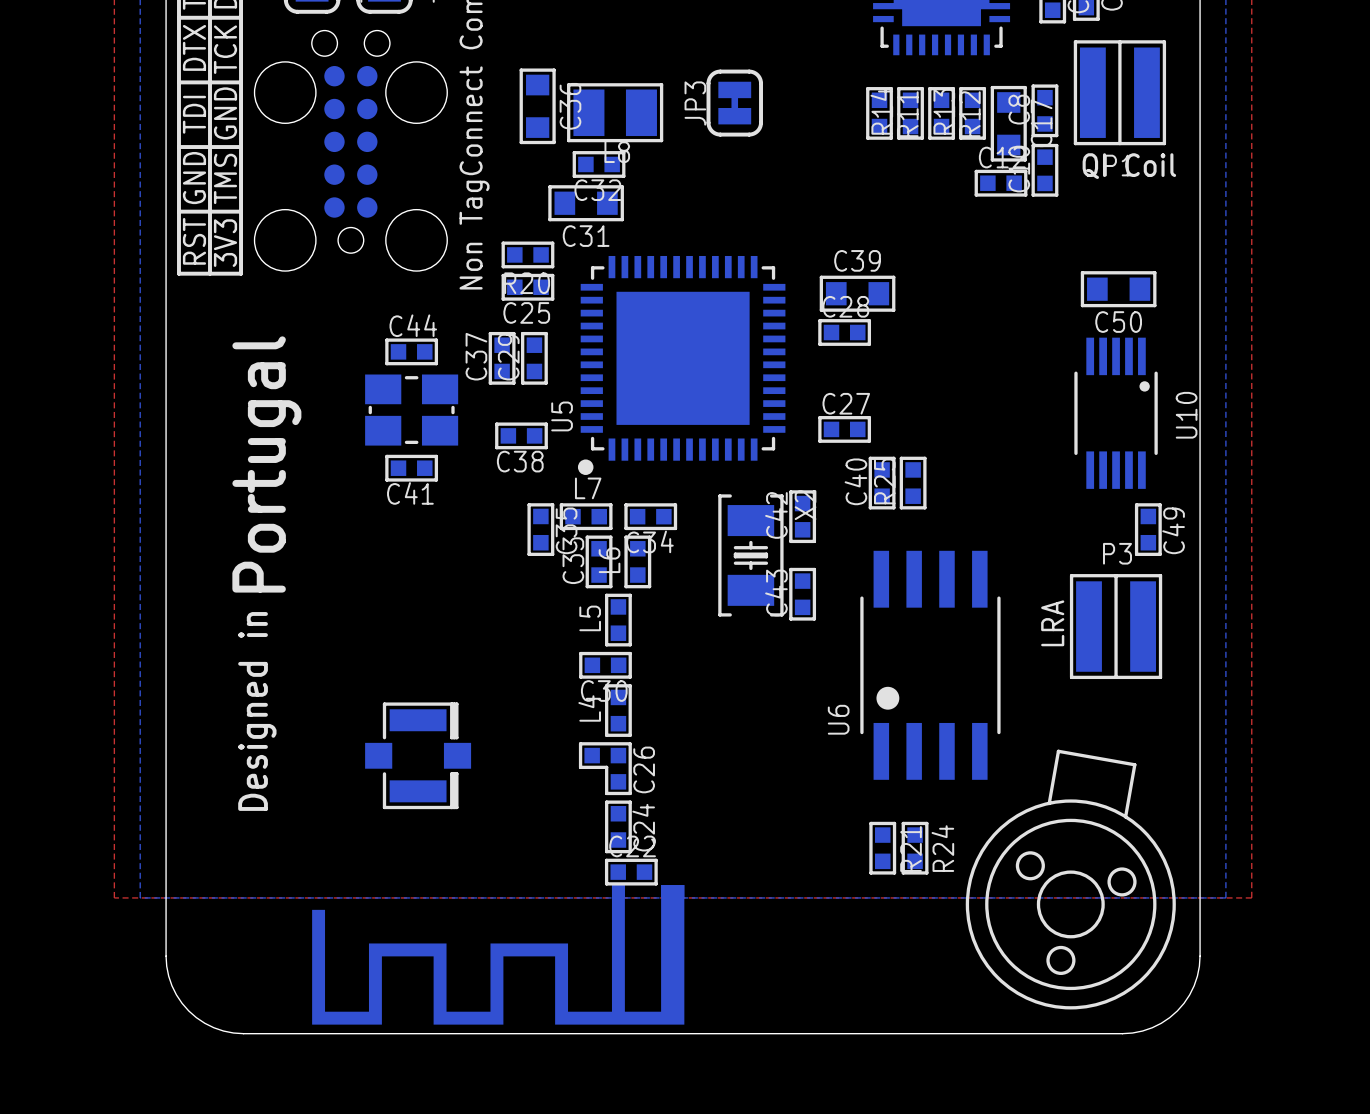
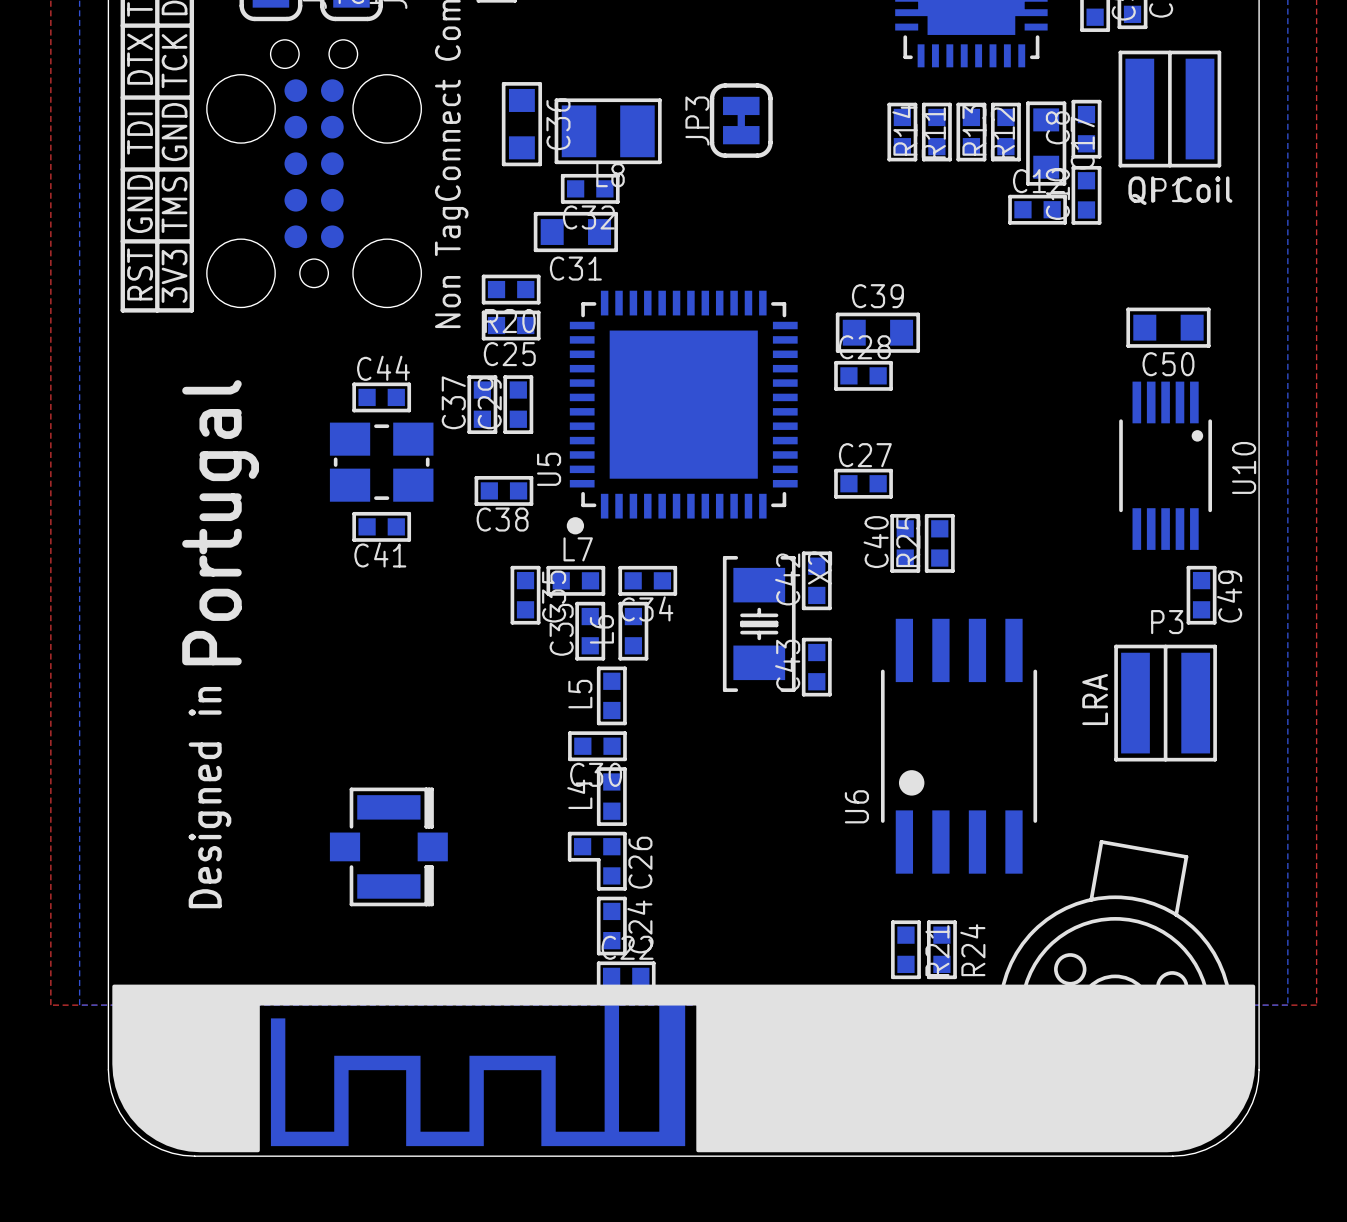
drawing: none -> [112, 984, 1256, 1153]

